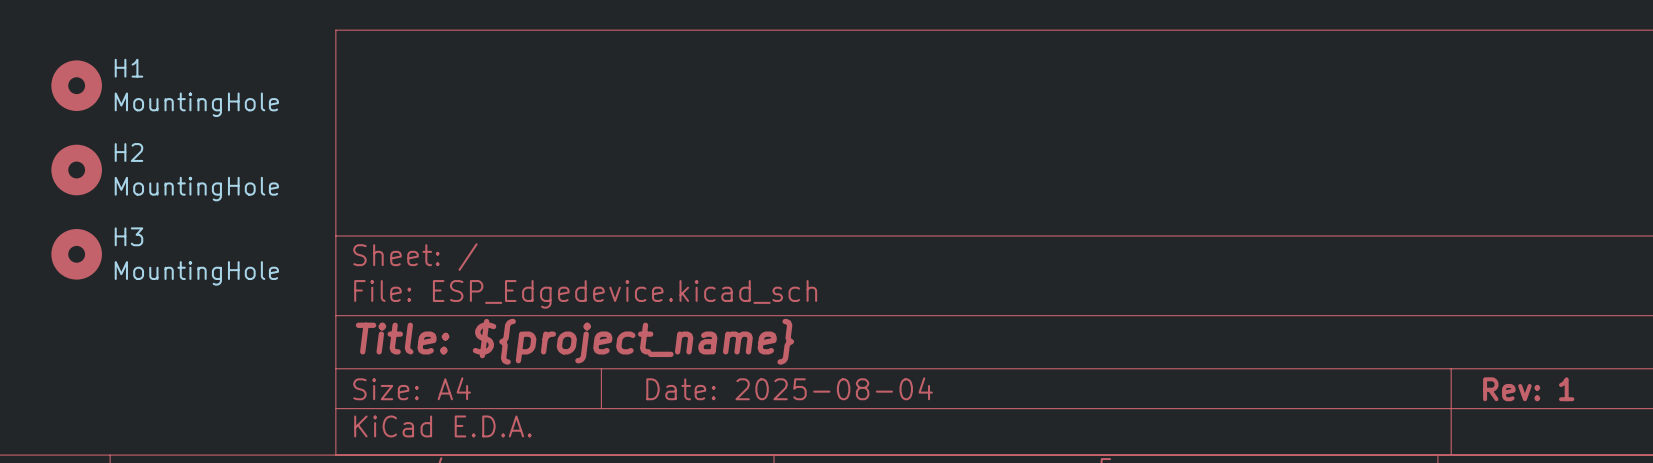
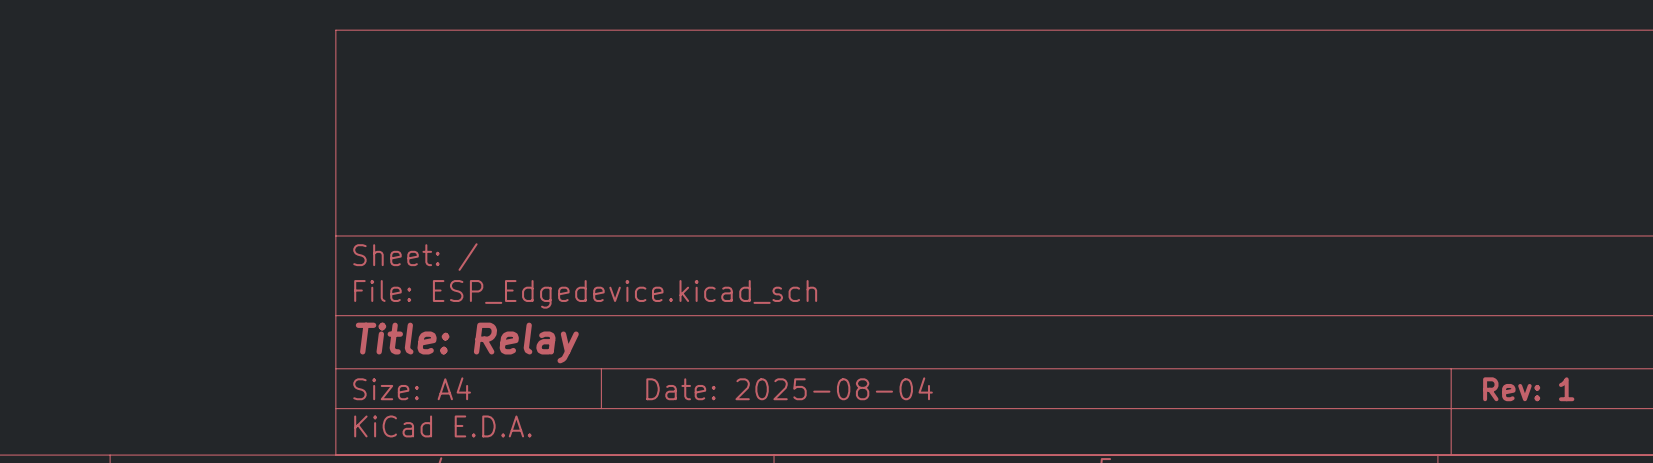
H1: MountingHole (76, 85) -> none
H2: MountingHole (76, 170) -> none
H3: MountingHole (76, 254) -> none
title block: Title: ${project_name} (574, 341) -> Title: Relay (467, 342)

